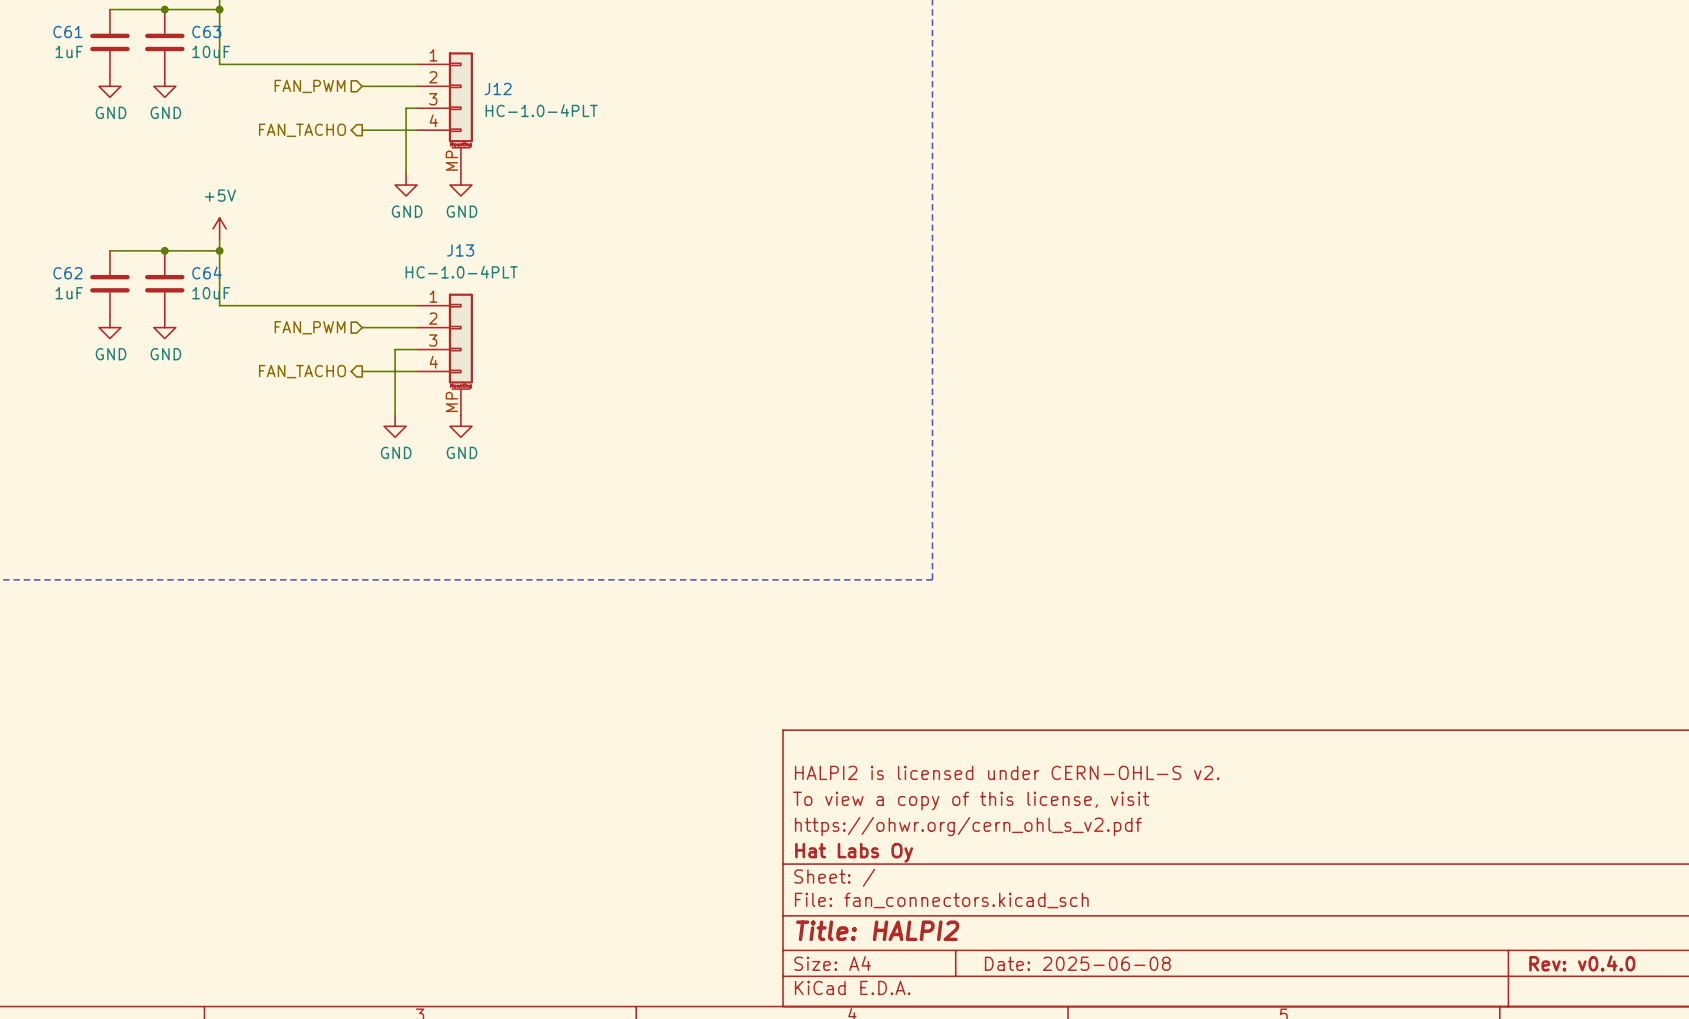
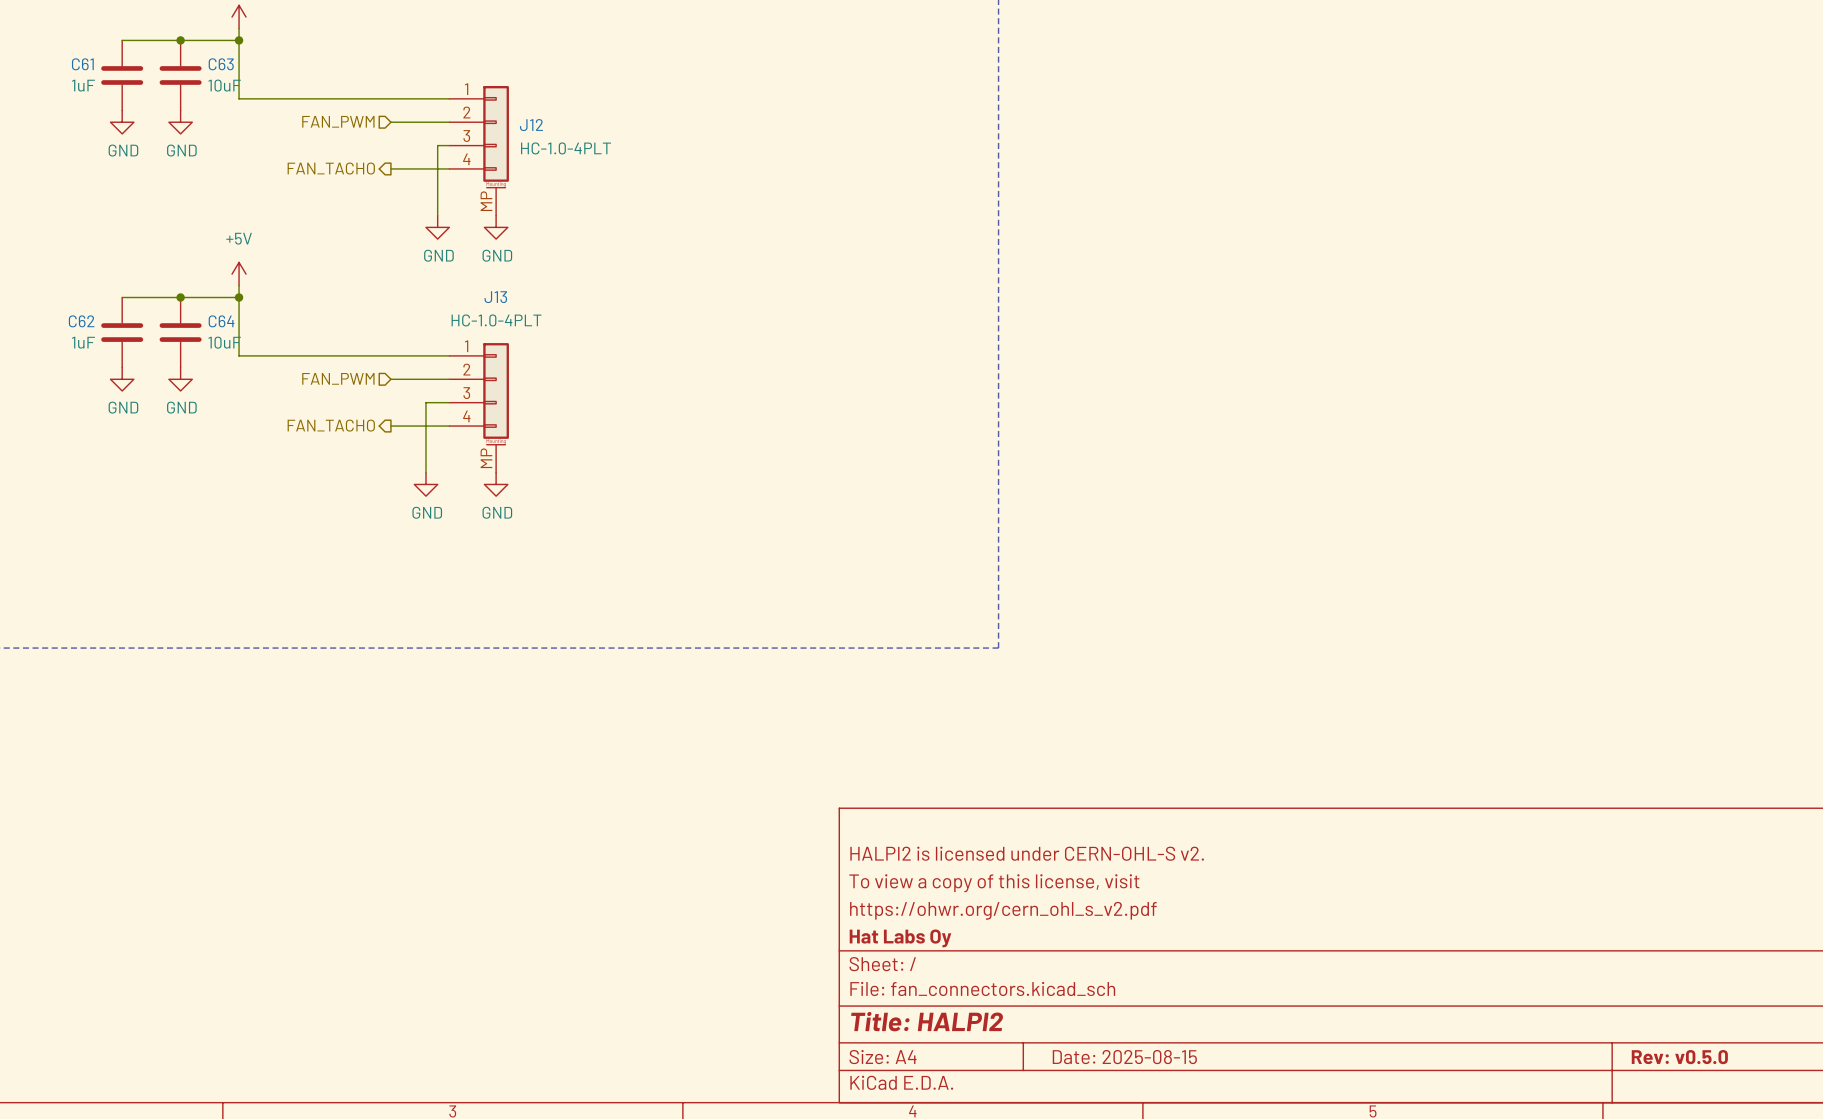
title block: Date: 2025-06-08 (1077, 963) -> Date: 2025-08-15 (1124, 1057)
title block: Rev: v0.4.0 (1582, 963) -> Rev: v0.5.0 (1679, 1057)

